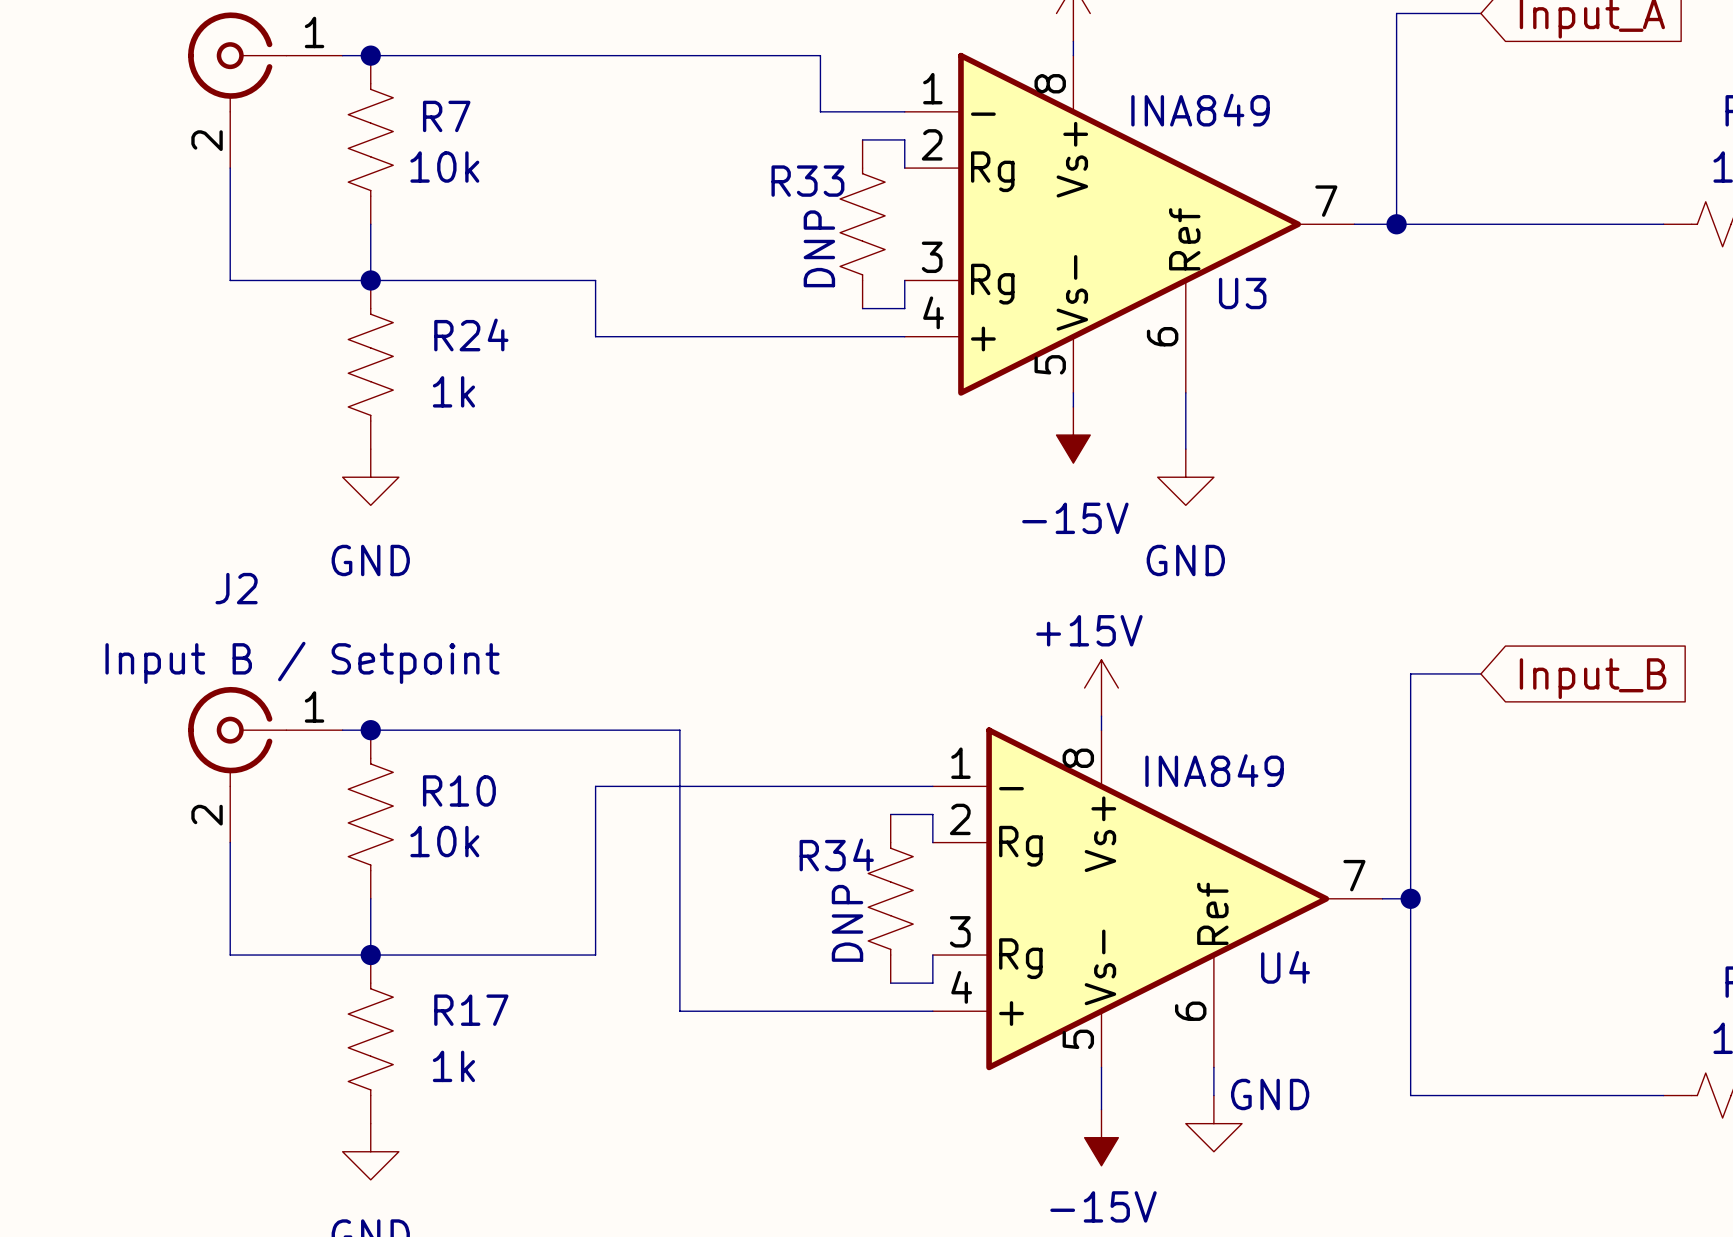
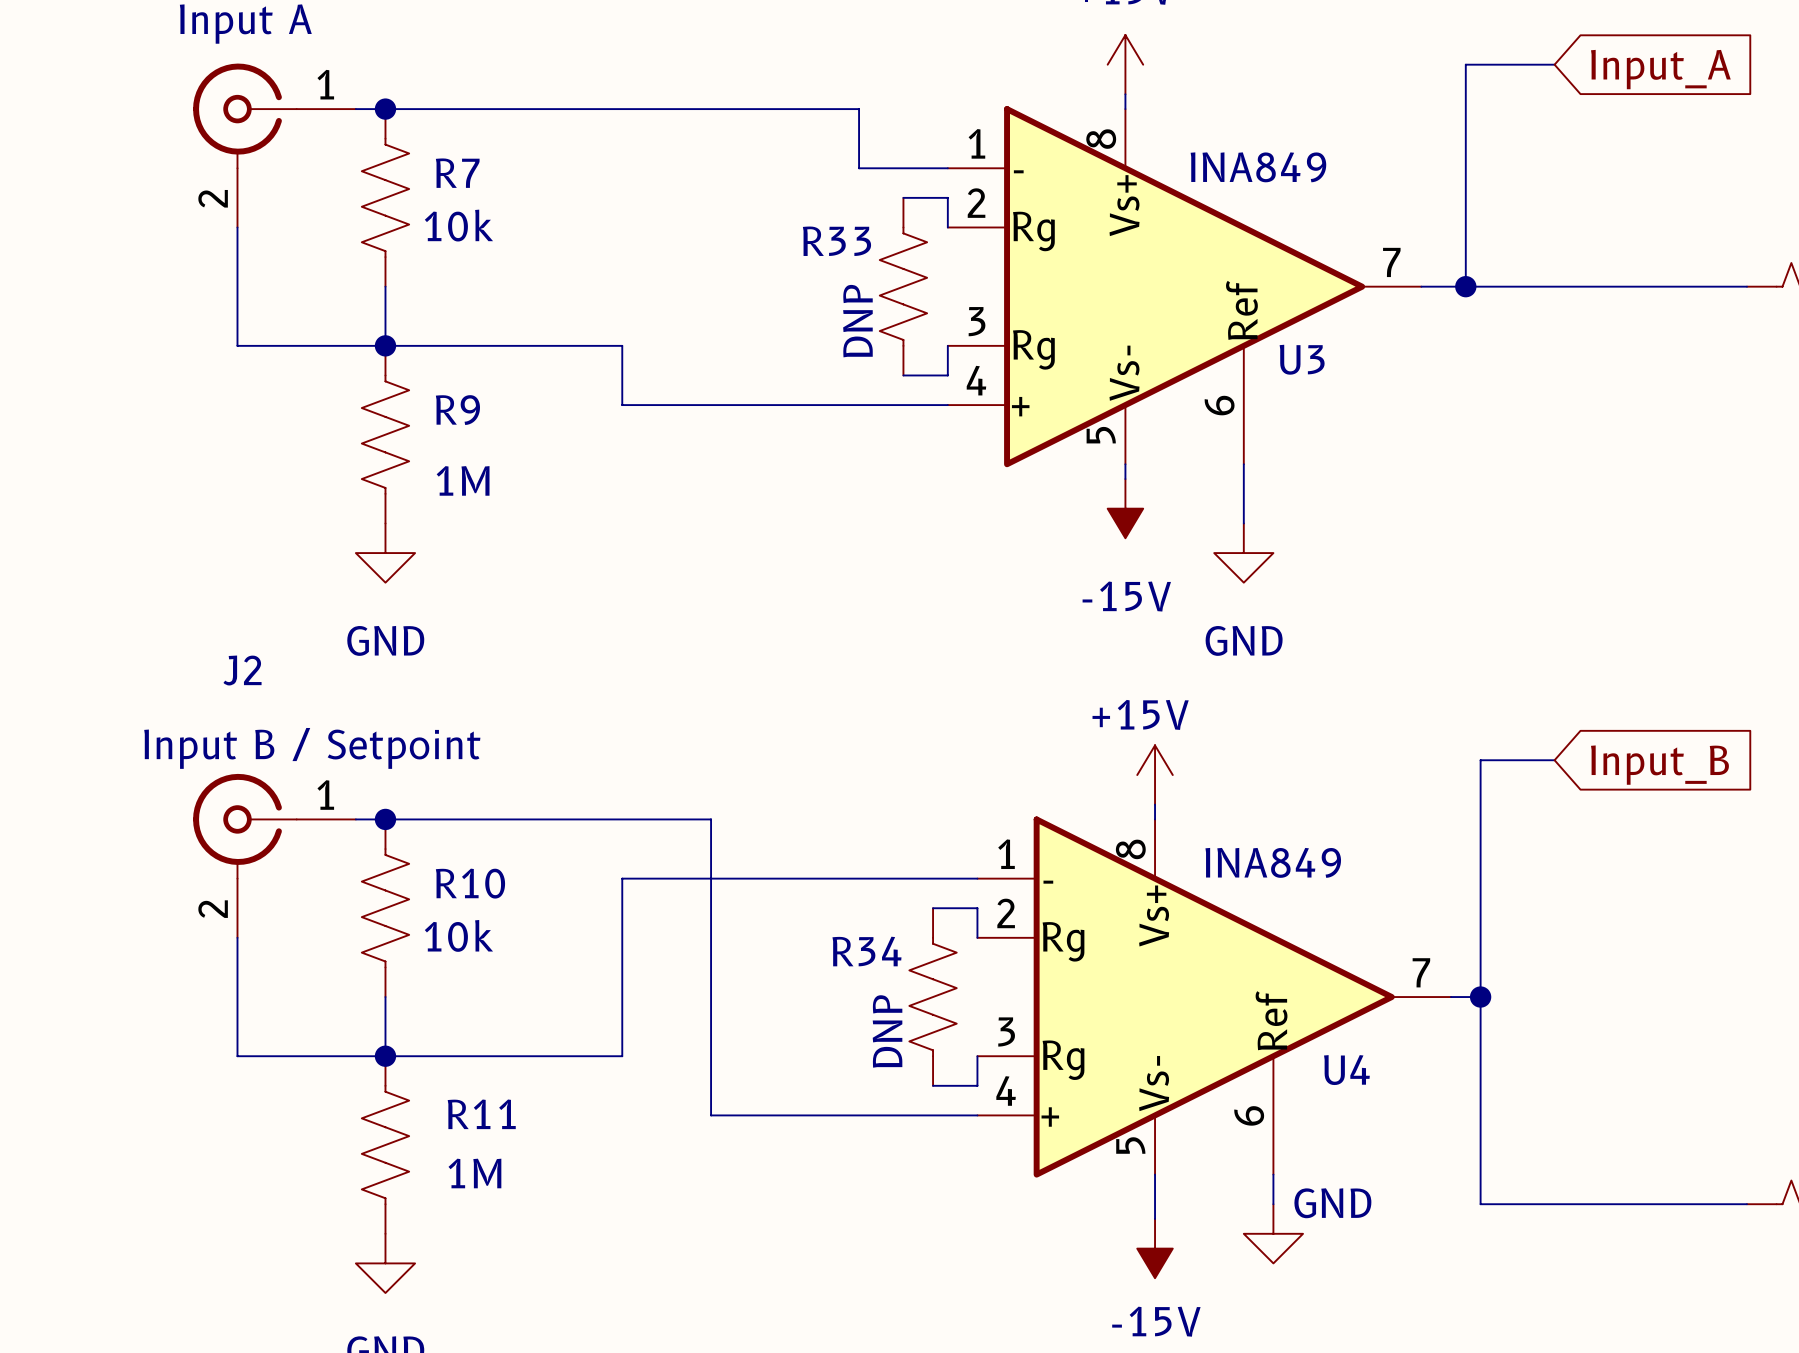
R24 name: R24 (471, 334) -> R9 (457, 410)
R24 value: 1k (453, 391) -> 1M (463, 480)
R17 name: R17 (471, 1010) -> R11 (481, 1114)
R17 value: 1k (453, 1066) -> 1M (474, 1173)

